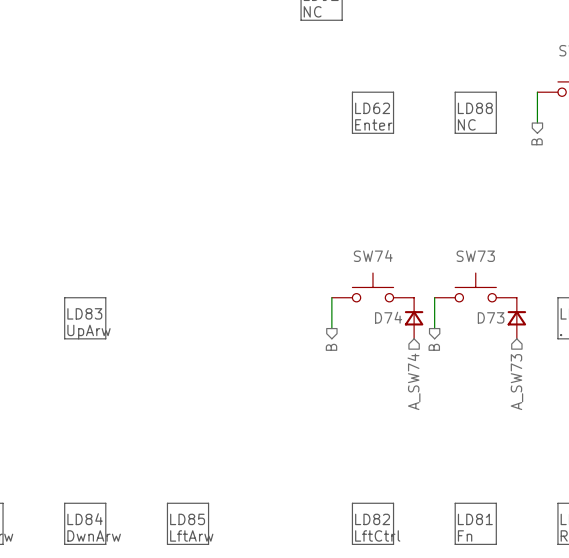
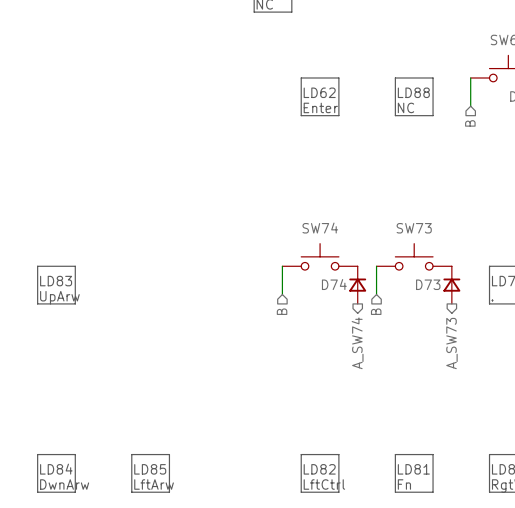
hierarchical label shape: output (537, 141) -> input (470, 123)
hierarchical label shape: output (331, 347) -> input (282, 311)
hierarchical label shape: output (434, 347) -> input (376, 311)
hierarchical label shape: input (413, 381) -> output (357, 343)
hierarchical label shape: input (516, 382) -> output (451, 343)

